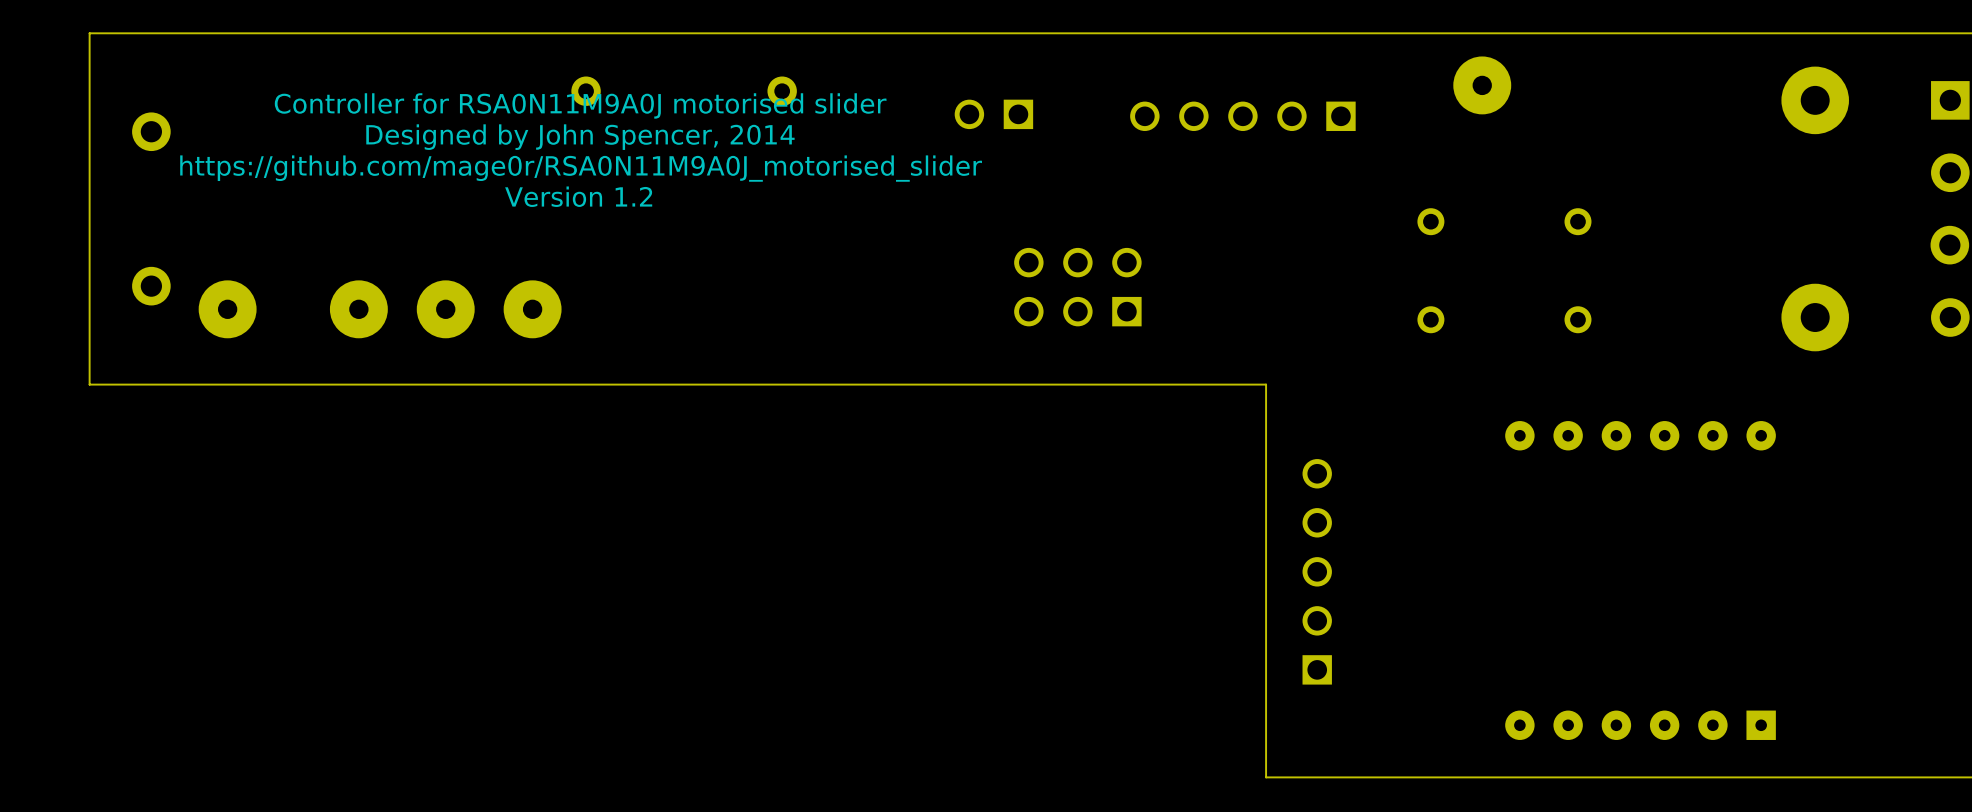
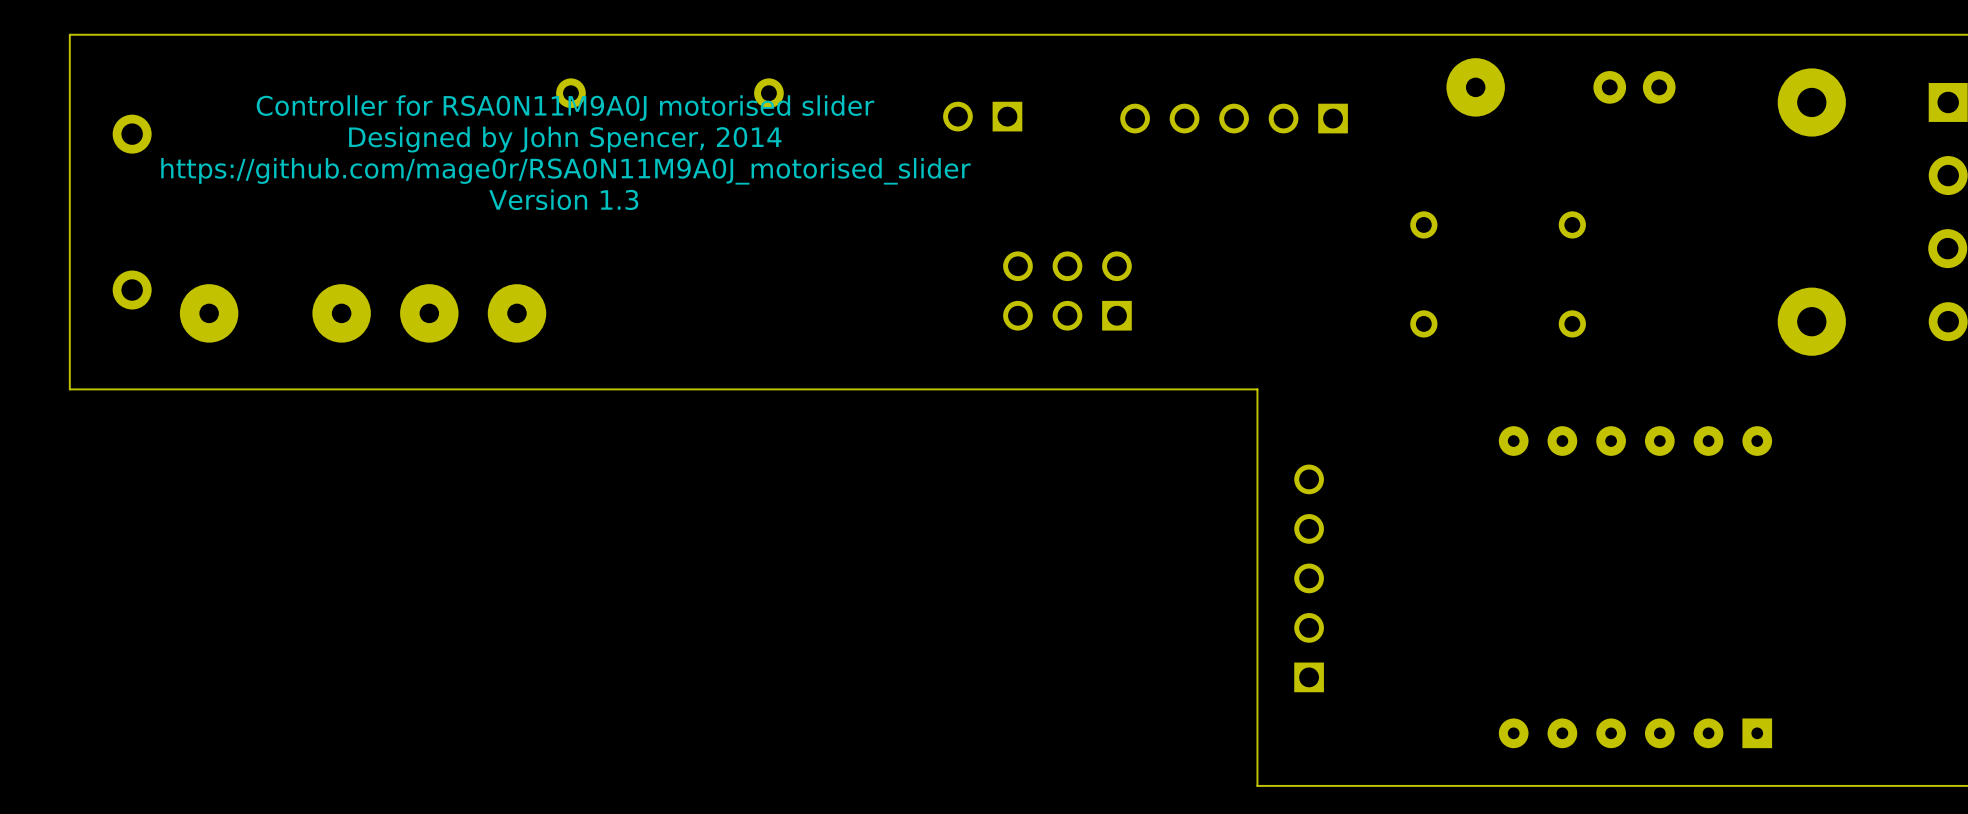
part: none -> (1634, 87)
text: Version 1.2 (578, 196) -> Version 1.3 (563, 199)

